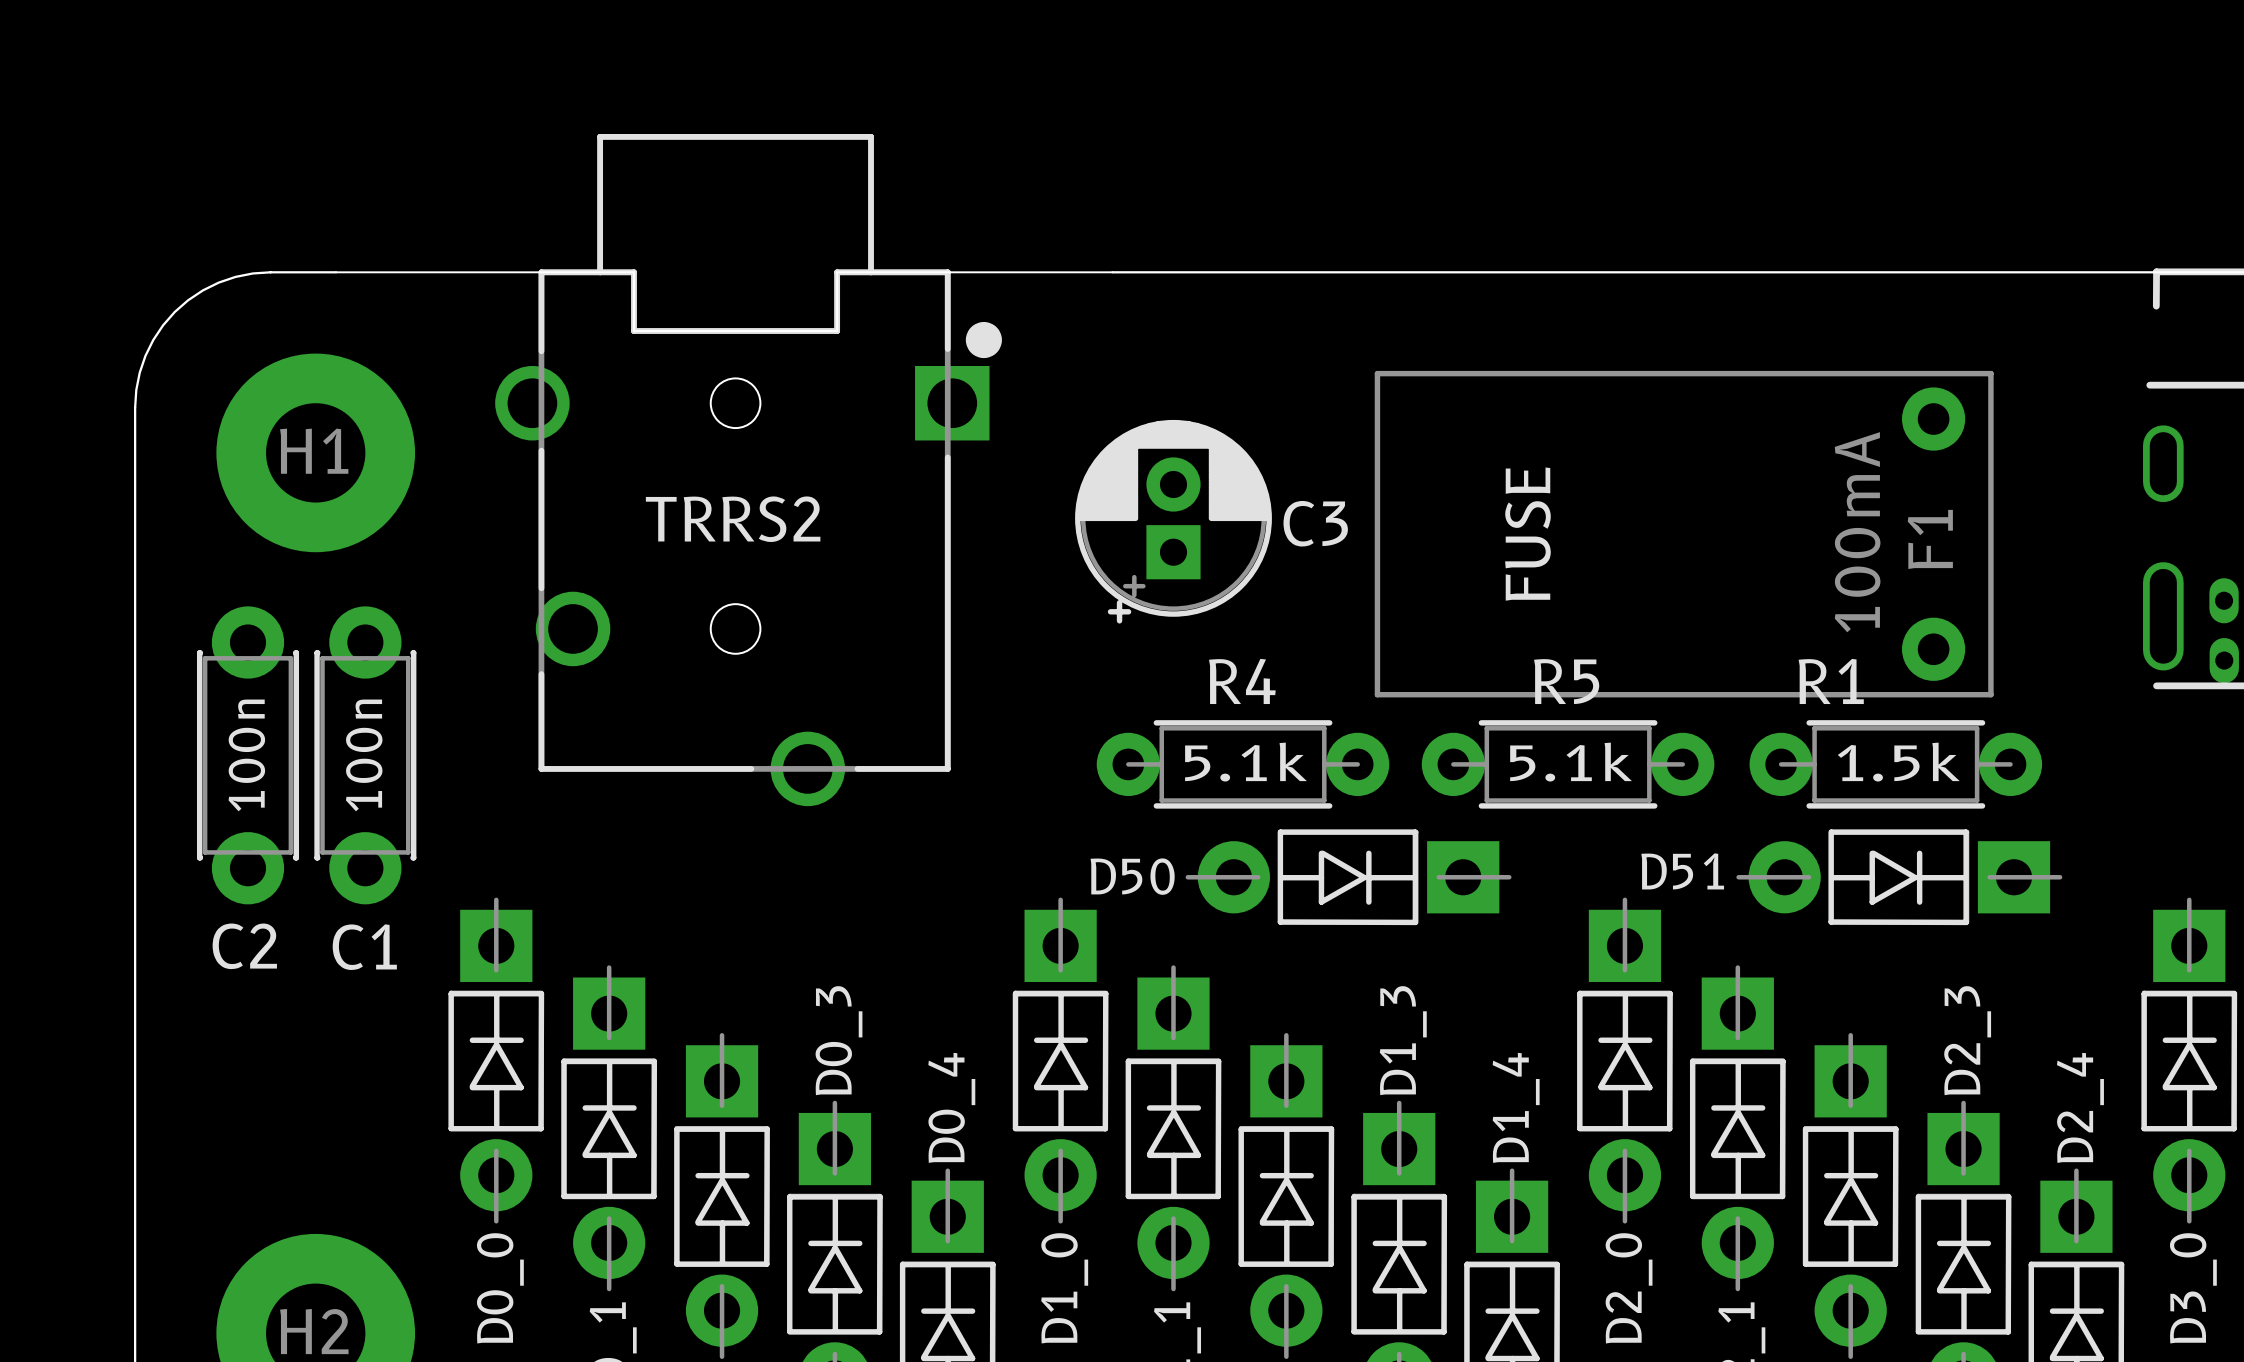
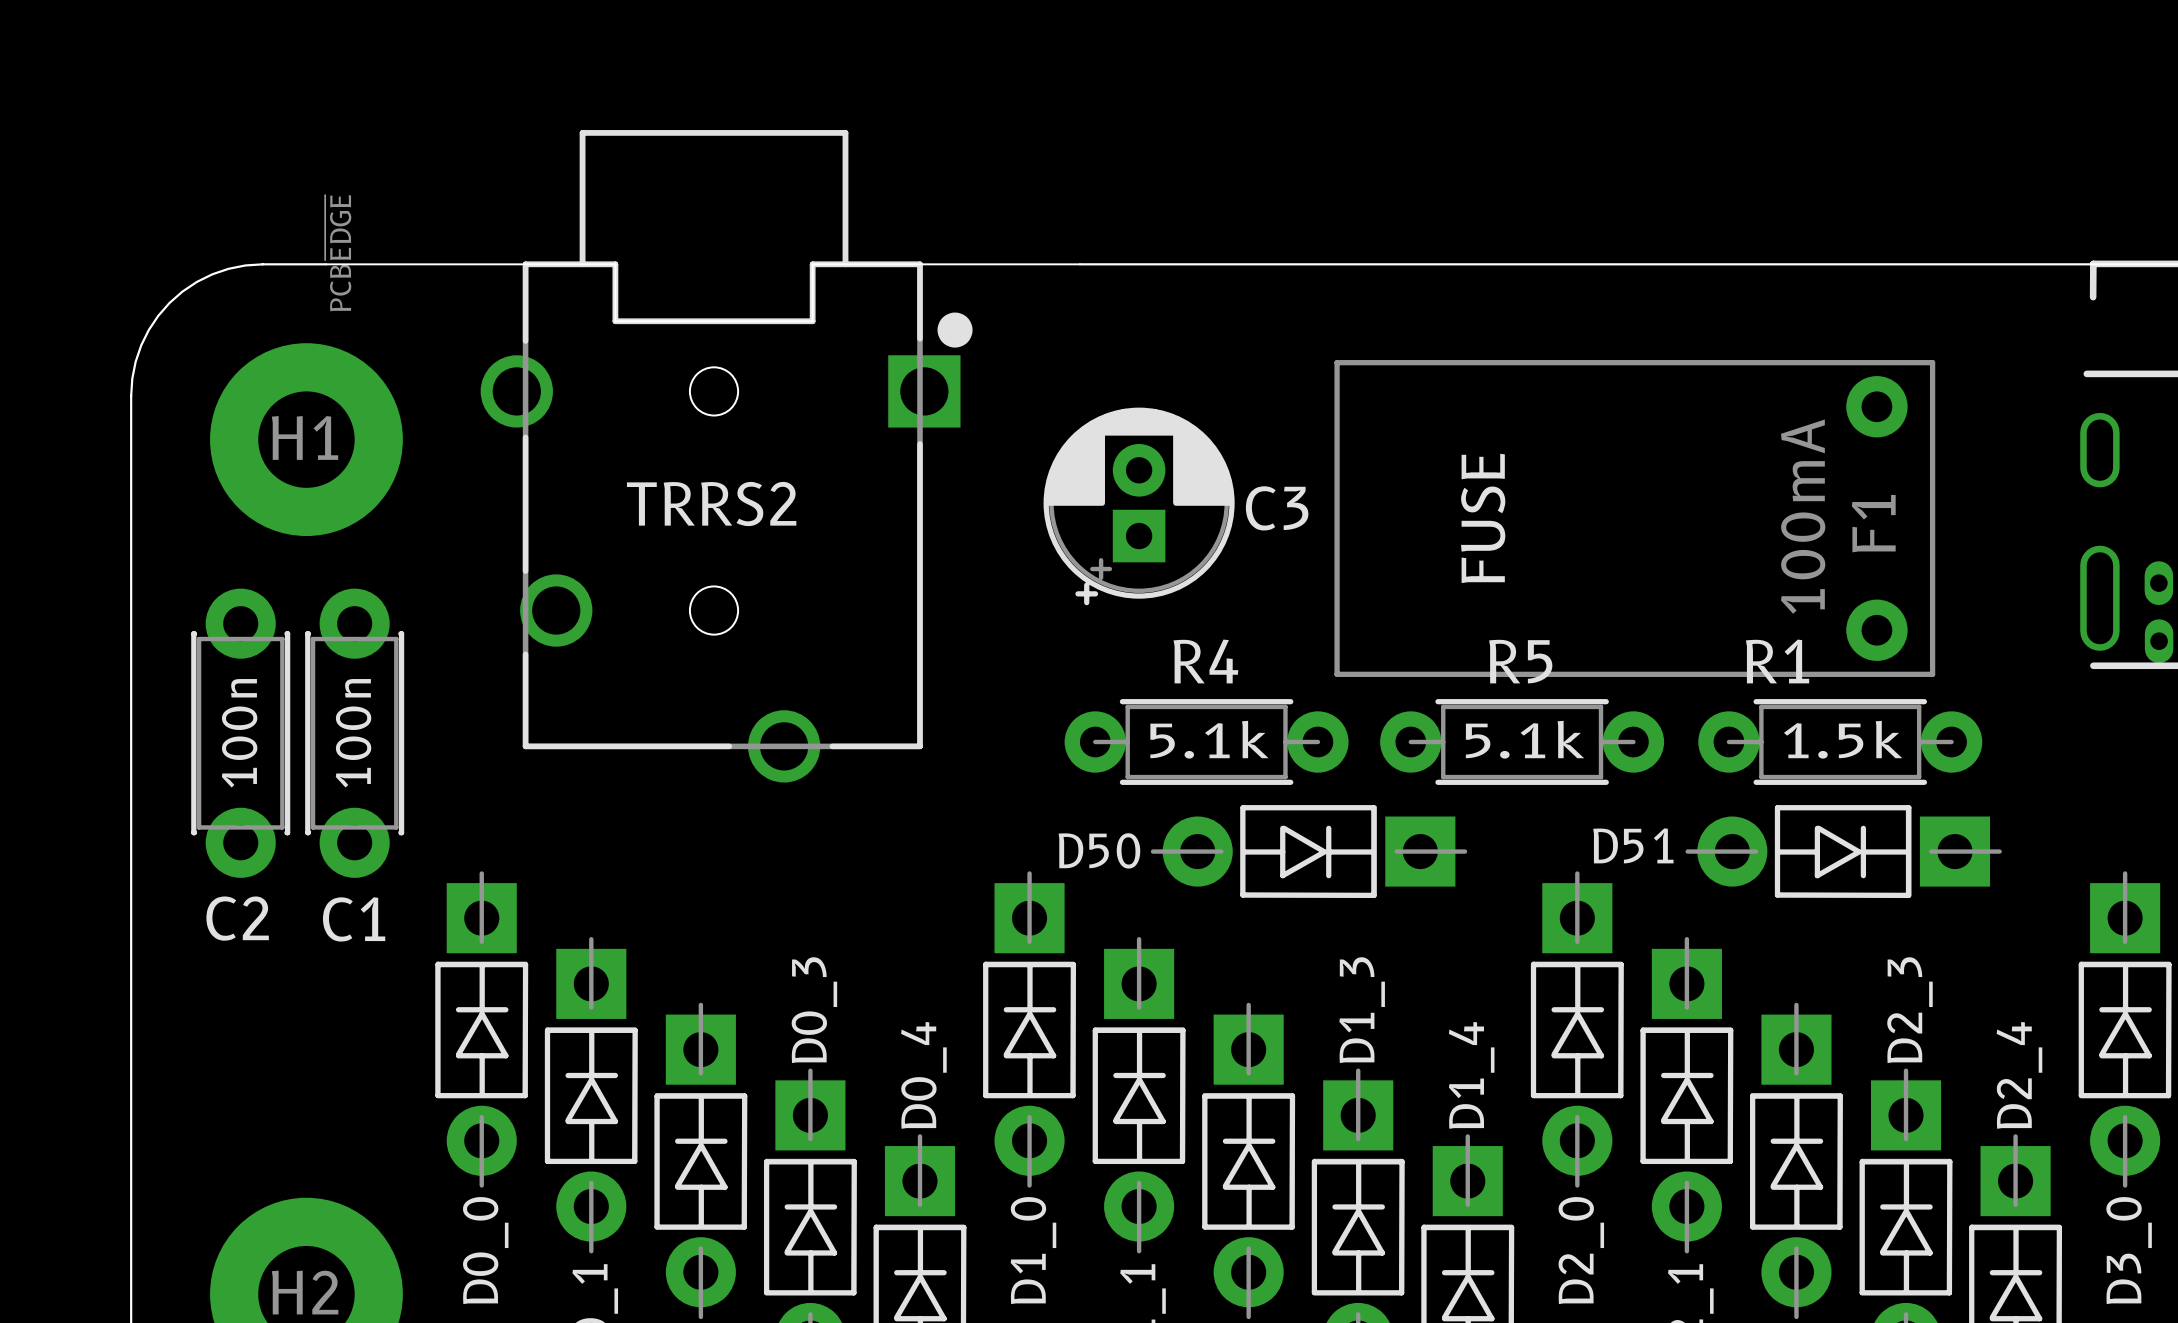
TRRS2 text: none -> PCB~{EDGE} (338, 253)

